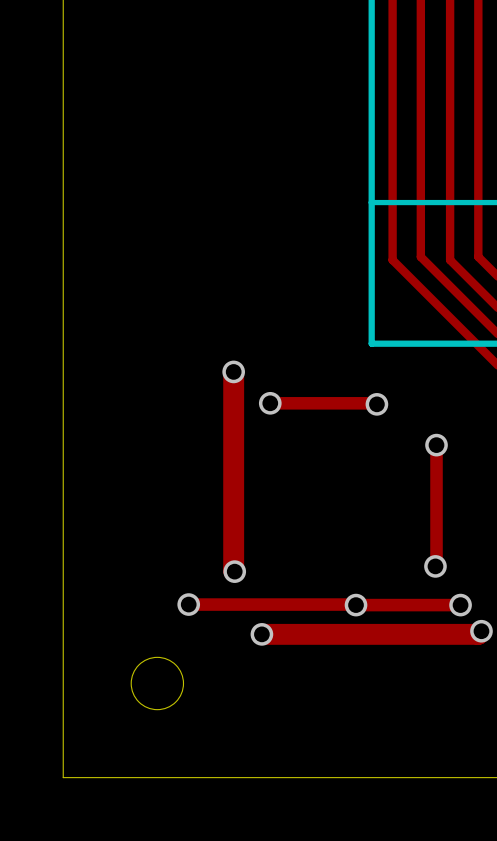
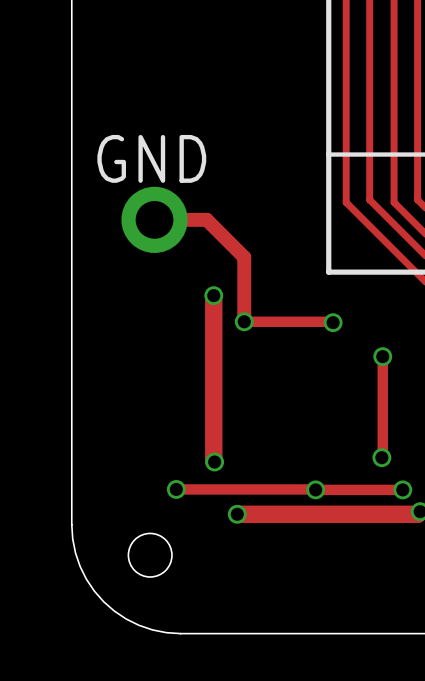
track: none -> (154, 219) (206, 219) (244, 257) (244, 321)
GND: none -> (154, 219)
board edge: (63, 646) (63, 777) (193, 777) -> (71, 524) (75, 552) (80, 566) (86, 579) (103, 601) (126, 619) (139, 625) (152, 629) (180, 633)

